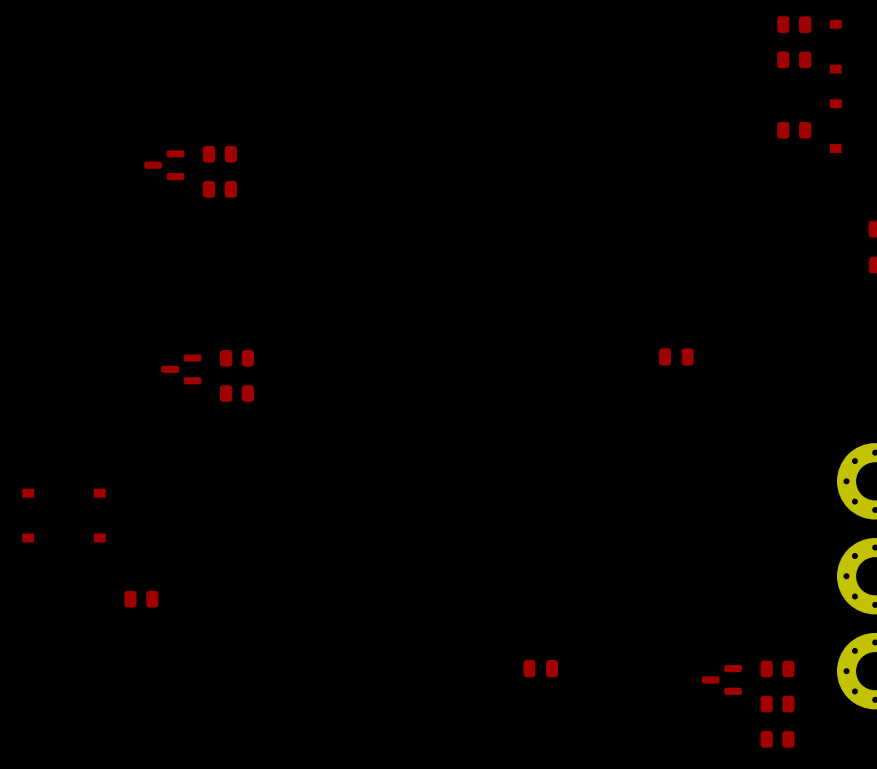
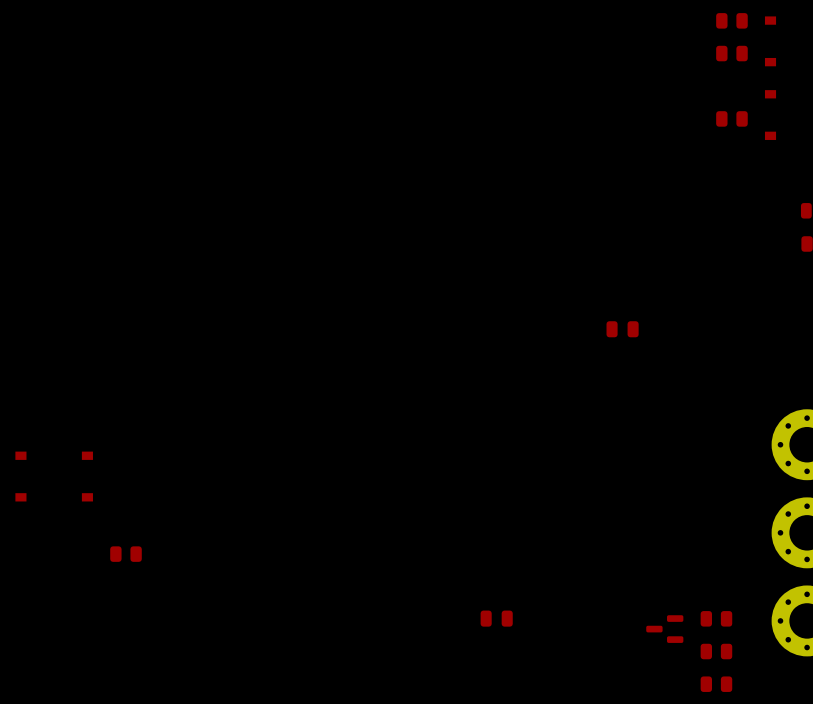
part: (219, 154) -> none
part: (164, 165) -> none
part: (219, 189) -> none
part: (237, 358) -> none
part: (181, 369) -> none
part: (237, 393) -> none

